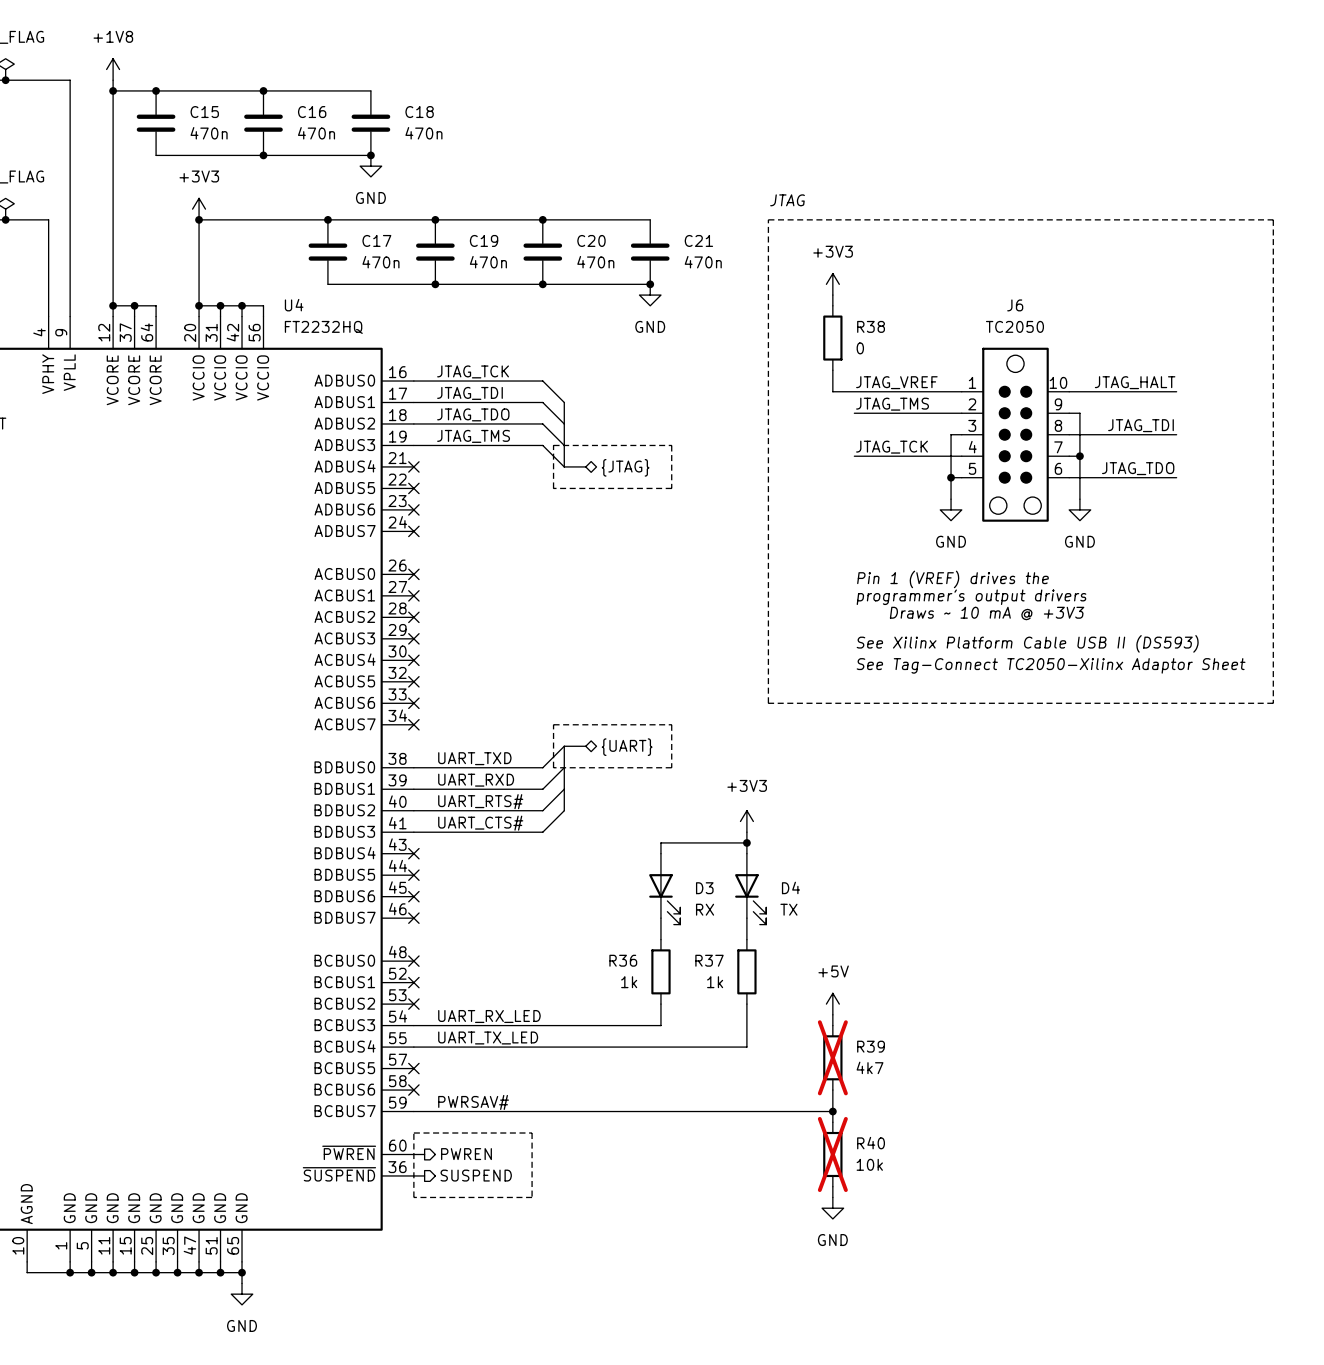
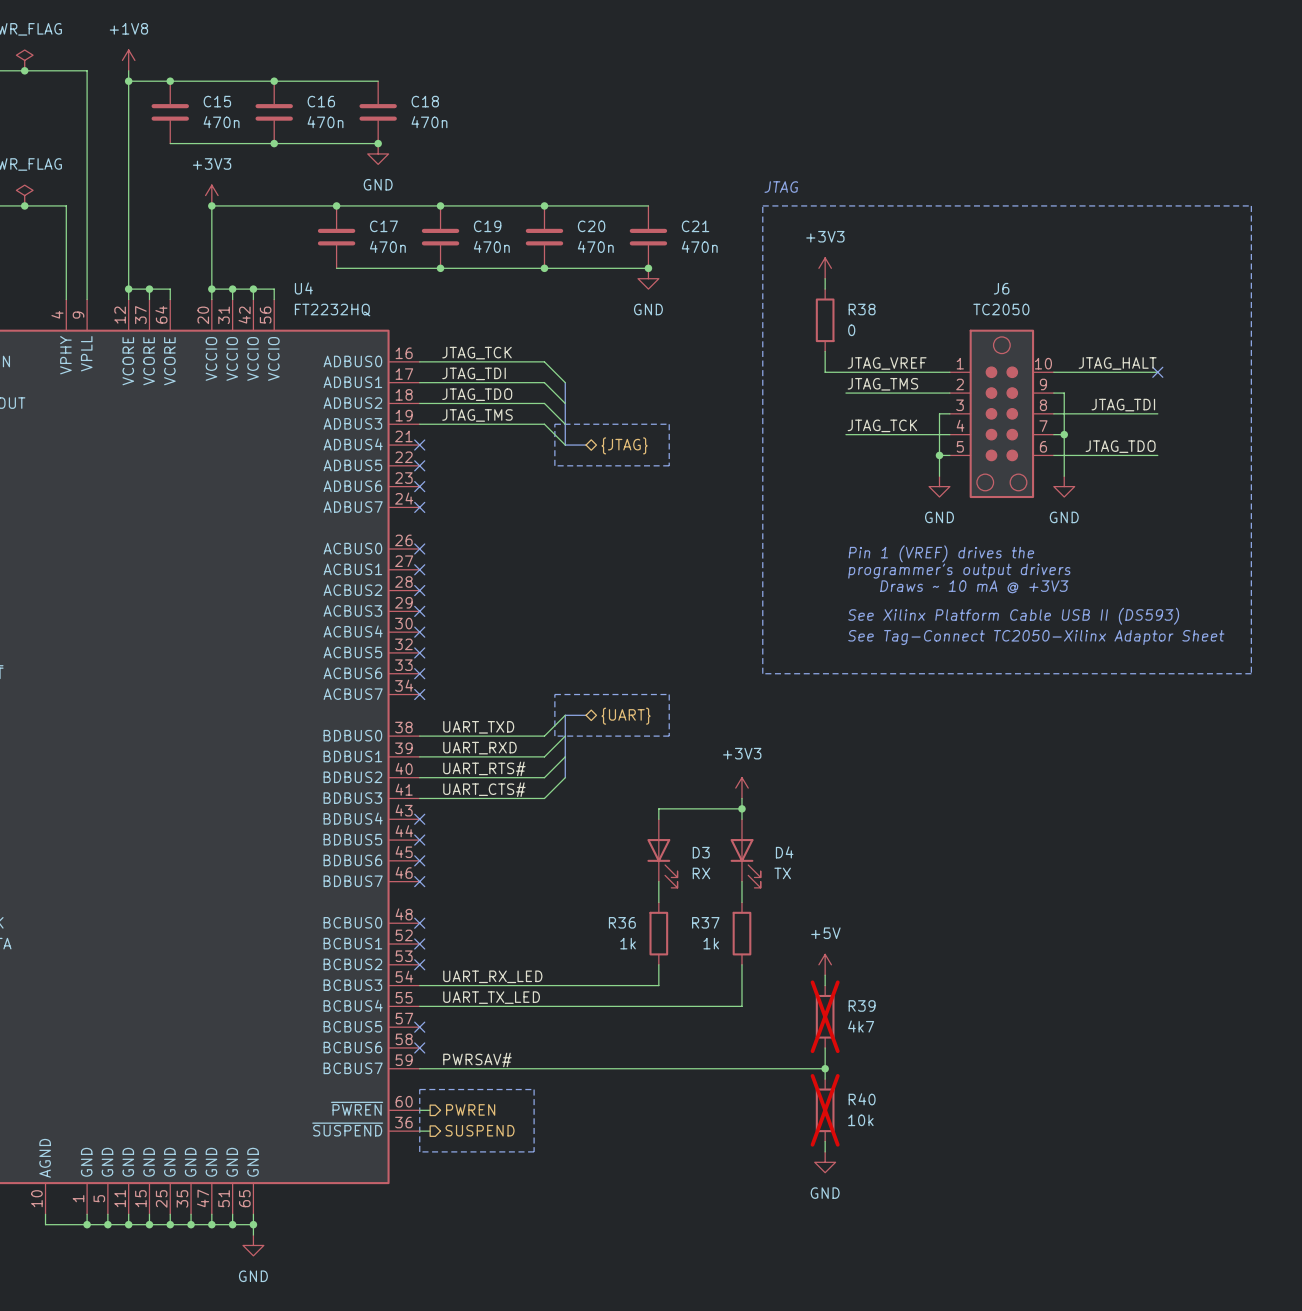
no-connect mark: none -> (1157, 372)

